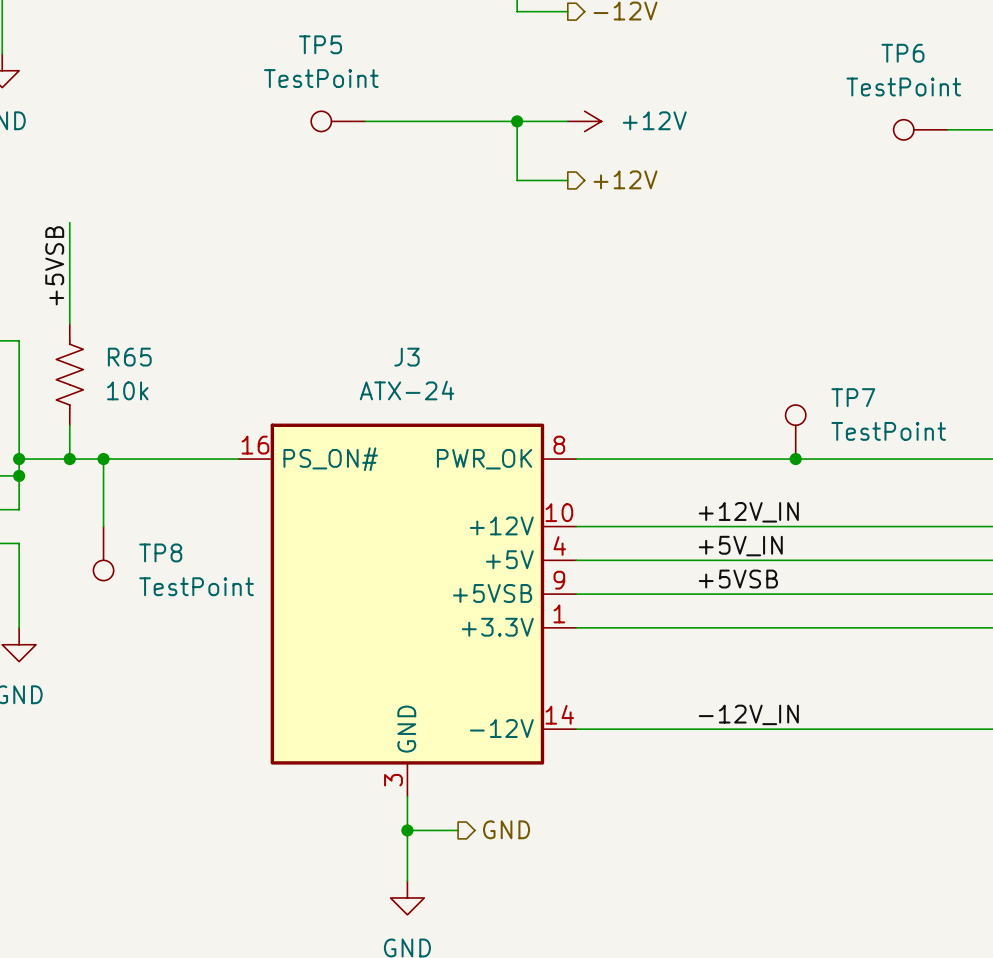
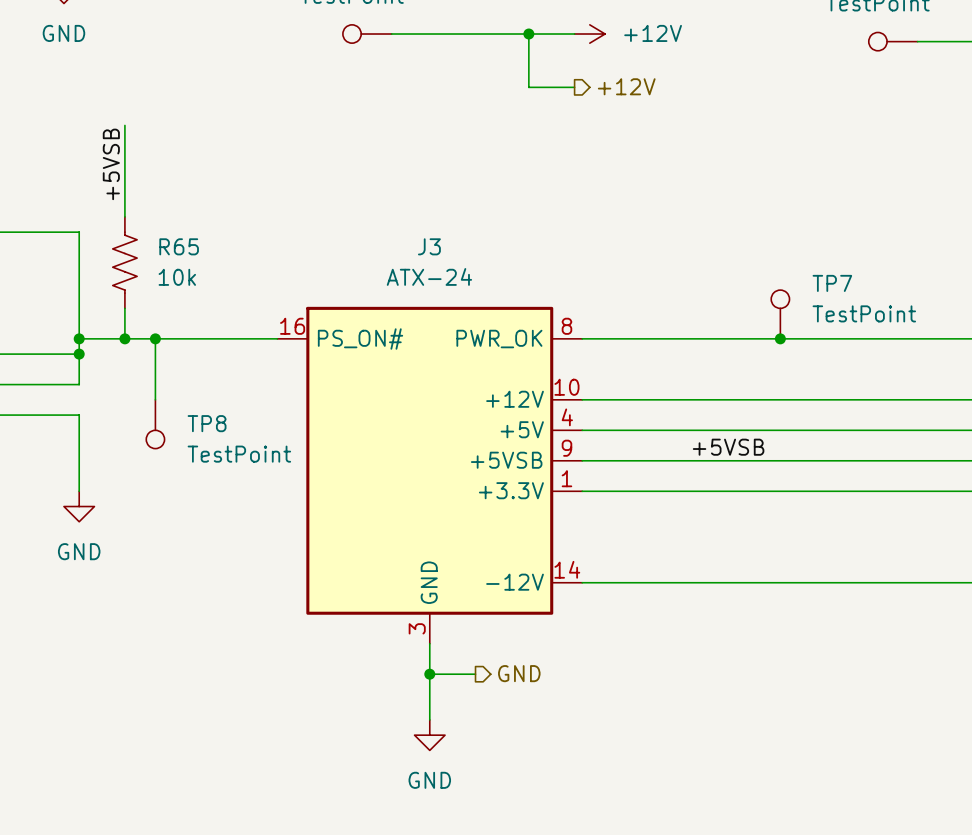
label: +12V_IN (748, 512) -> none
label: +5V_IN (740, 546) -> none
label: -12V_IN (748, 714) -> none

